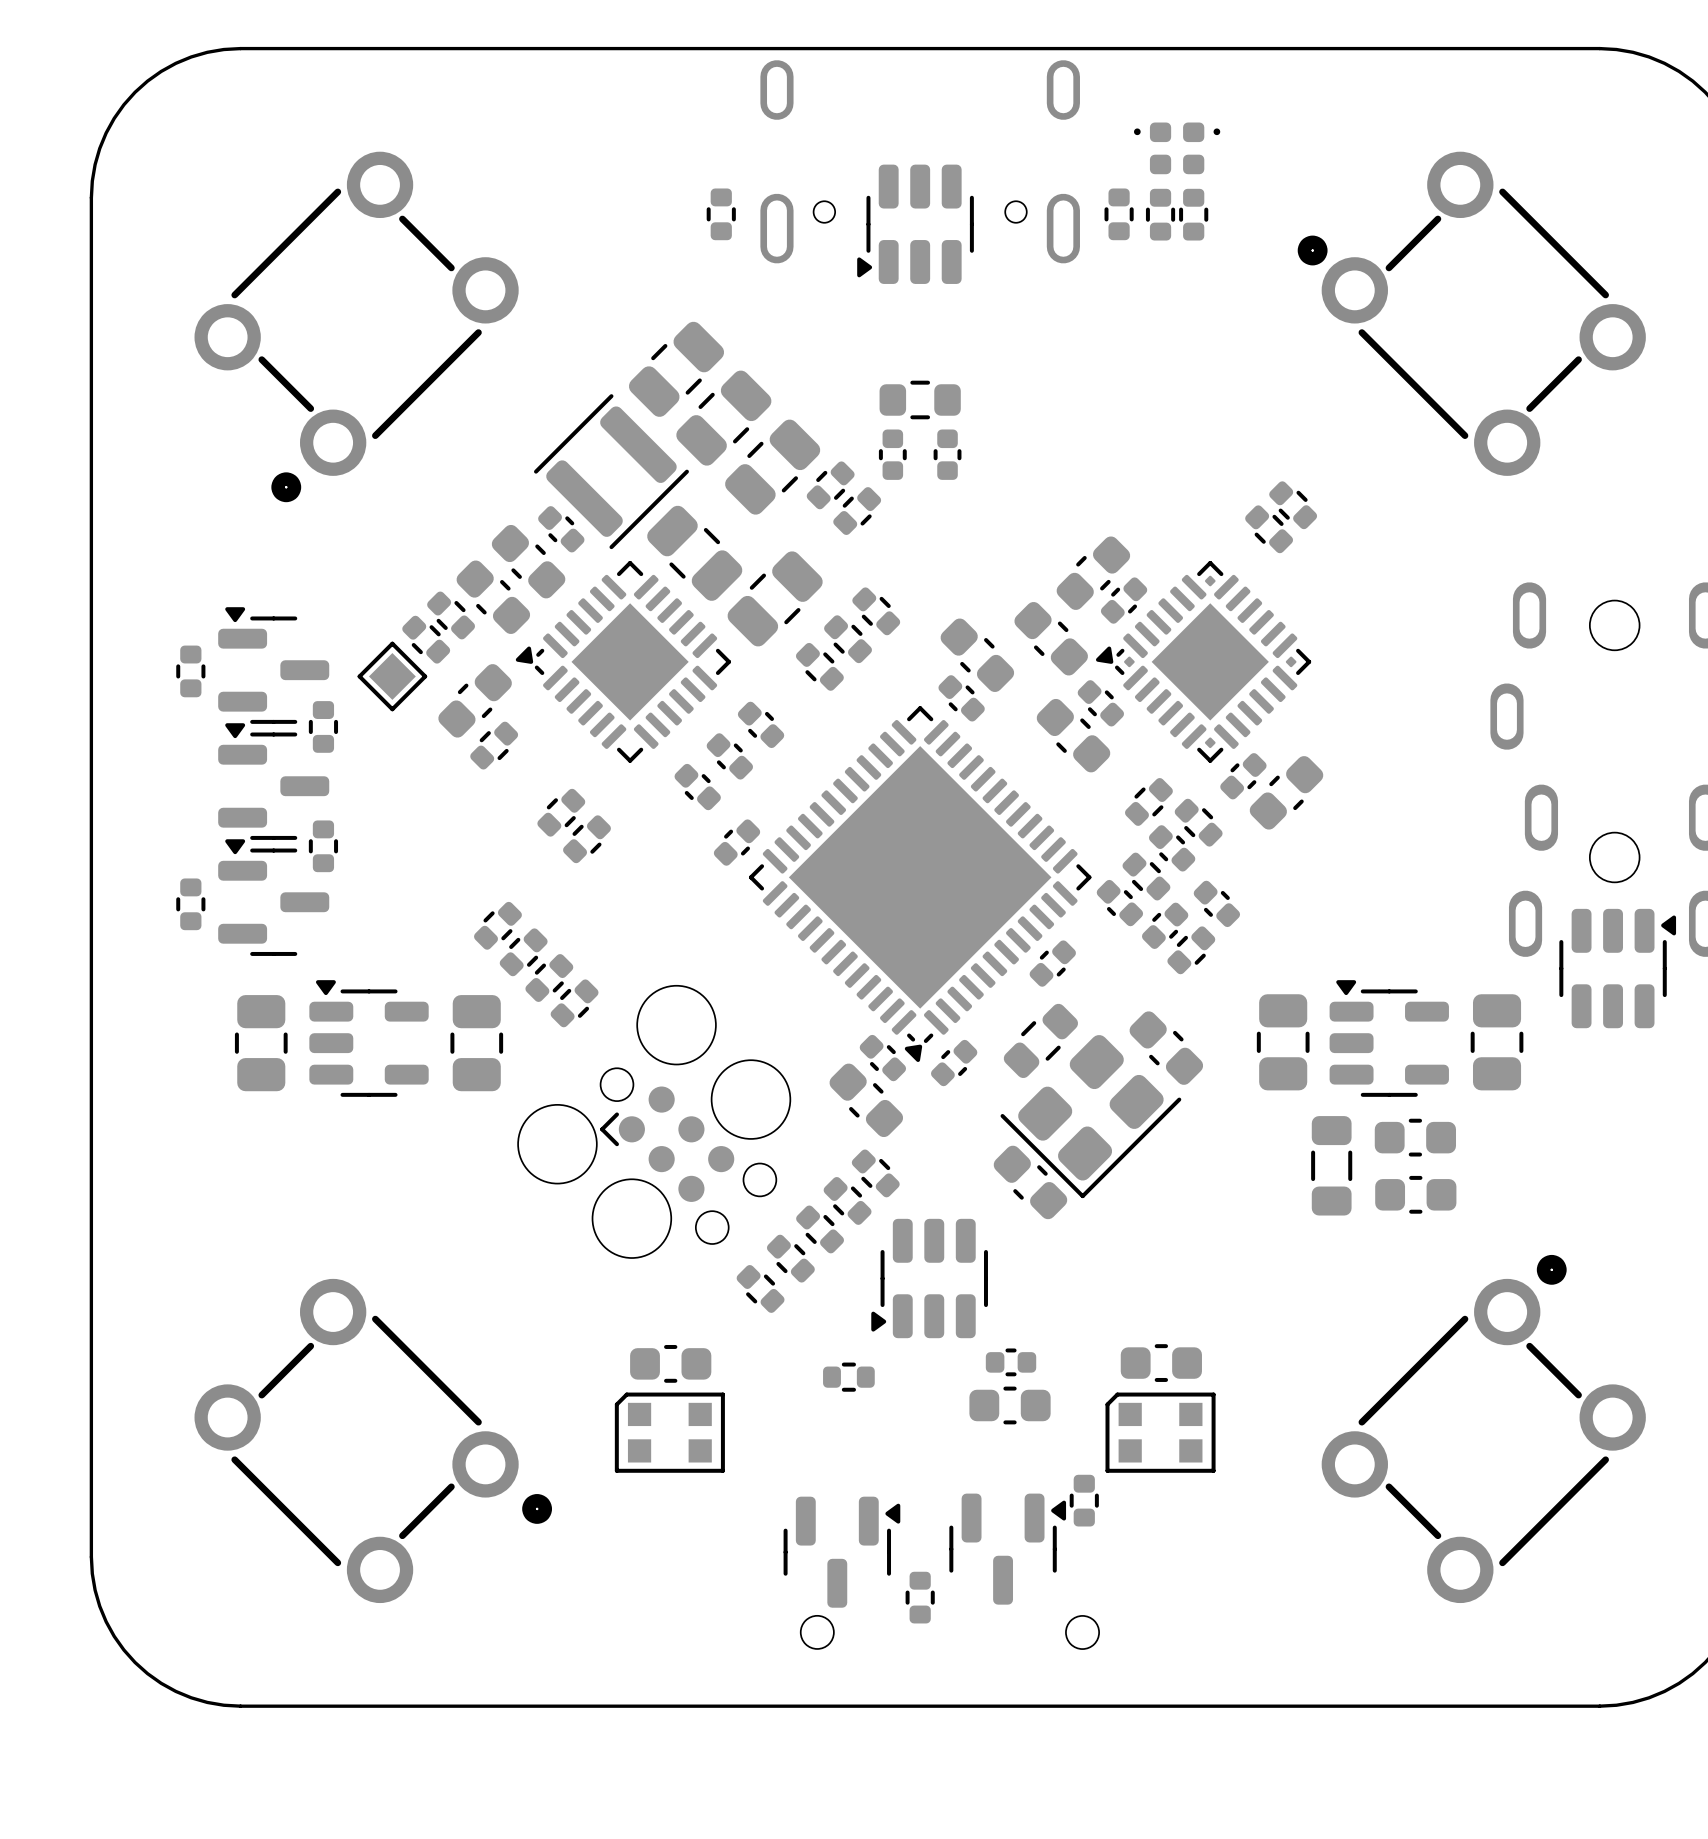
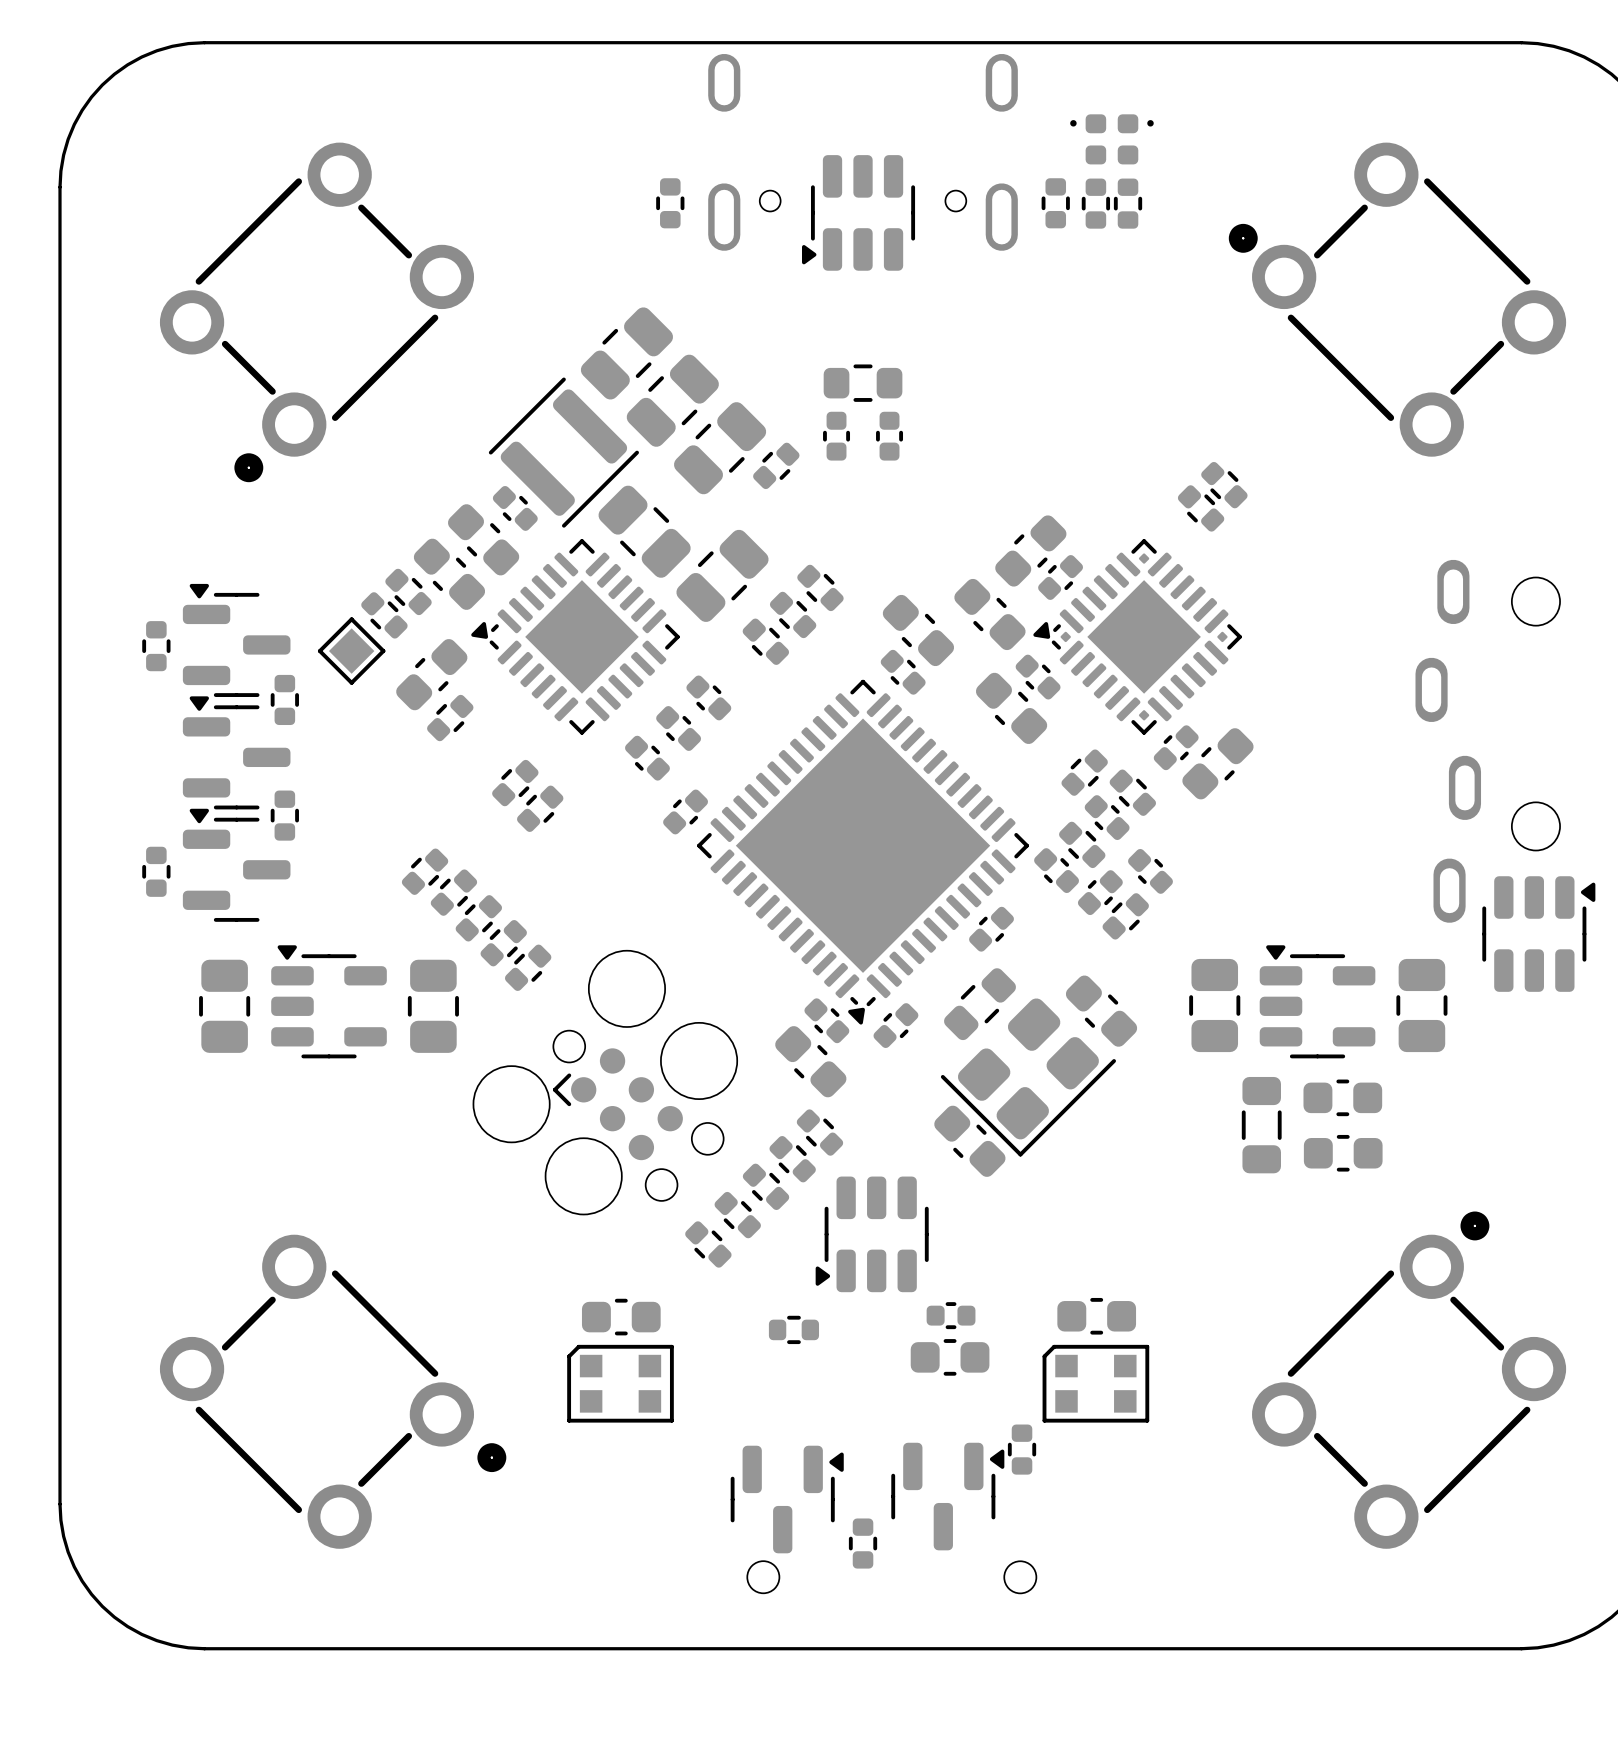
part position: (857, 511) -> (425, 871)

